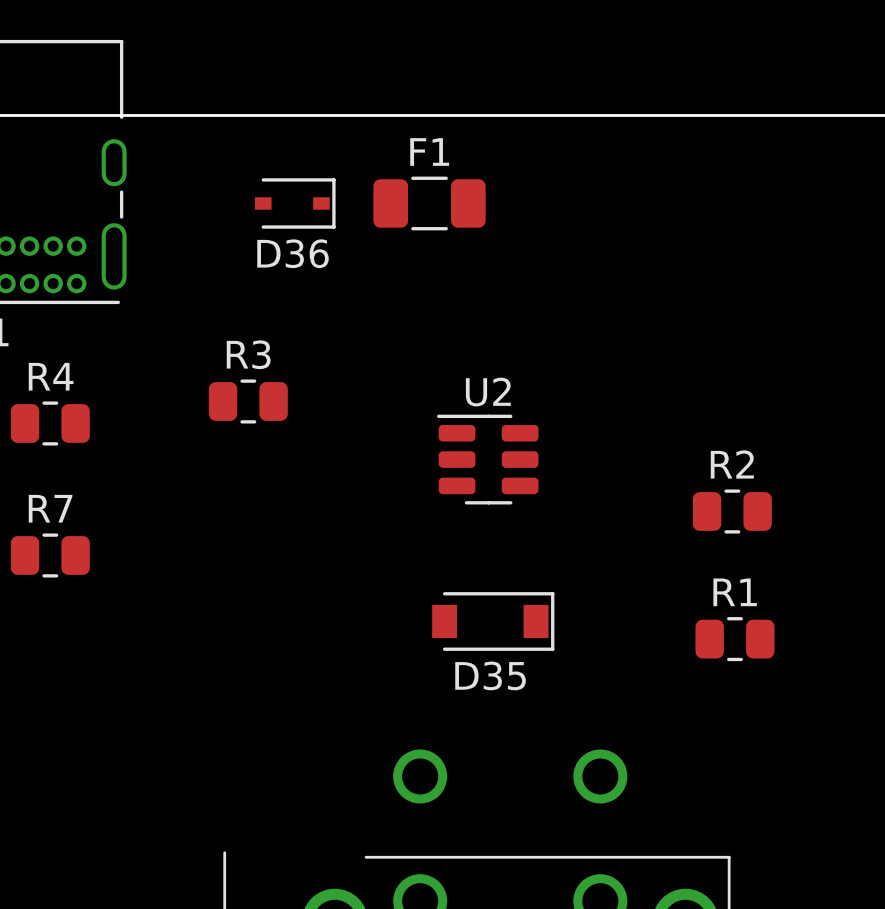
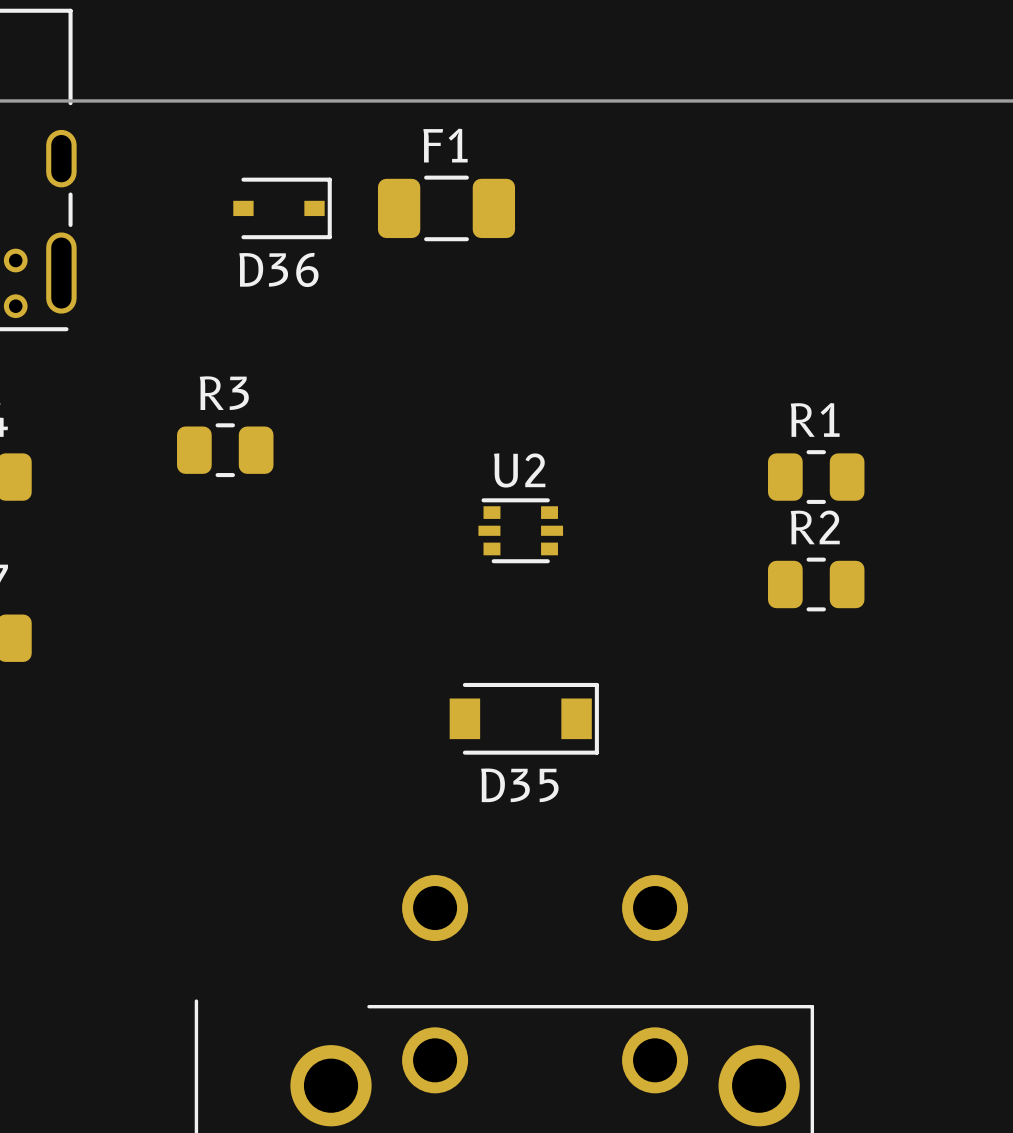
U2 footprint: [437, 414, 539, 505] -> [478, 498, 564, 564]
R1 position: (734, 639) -> (816, 477)

